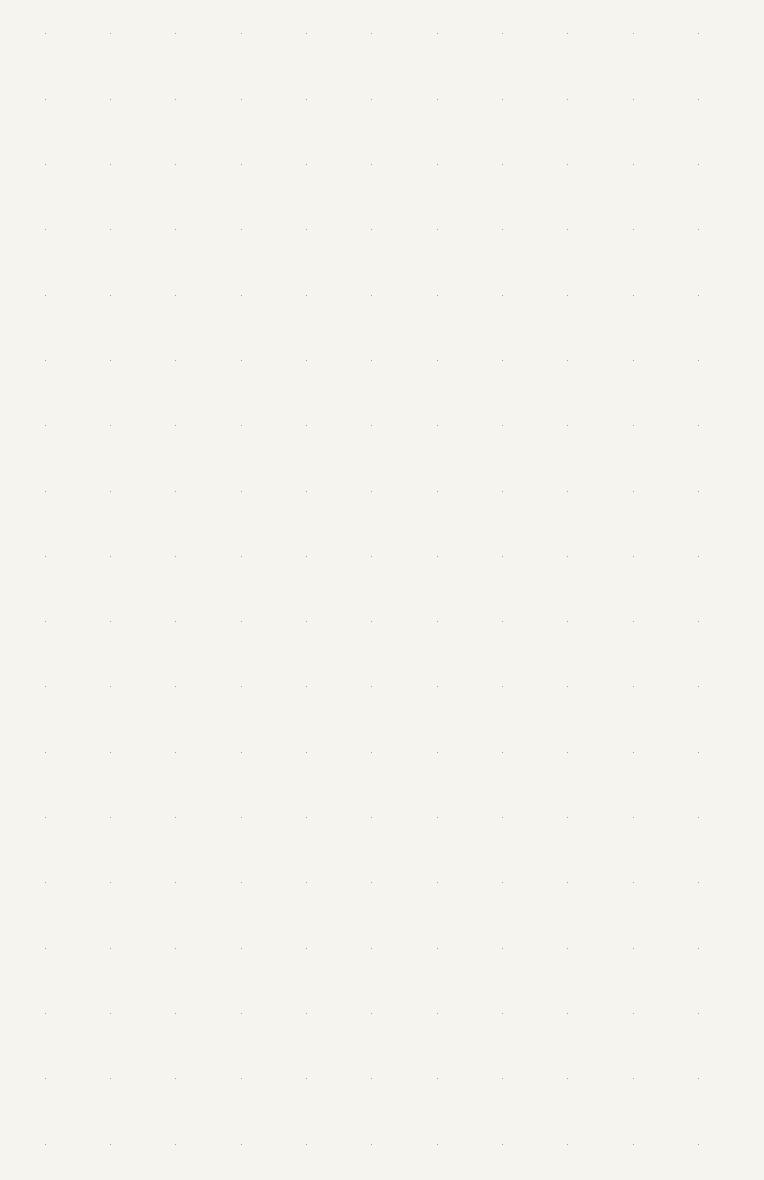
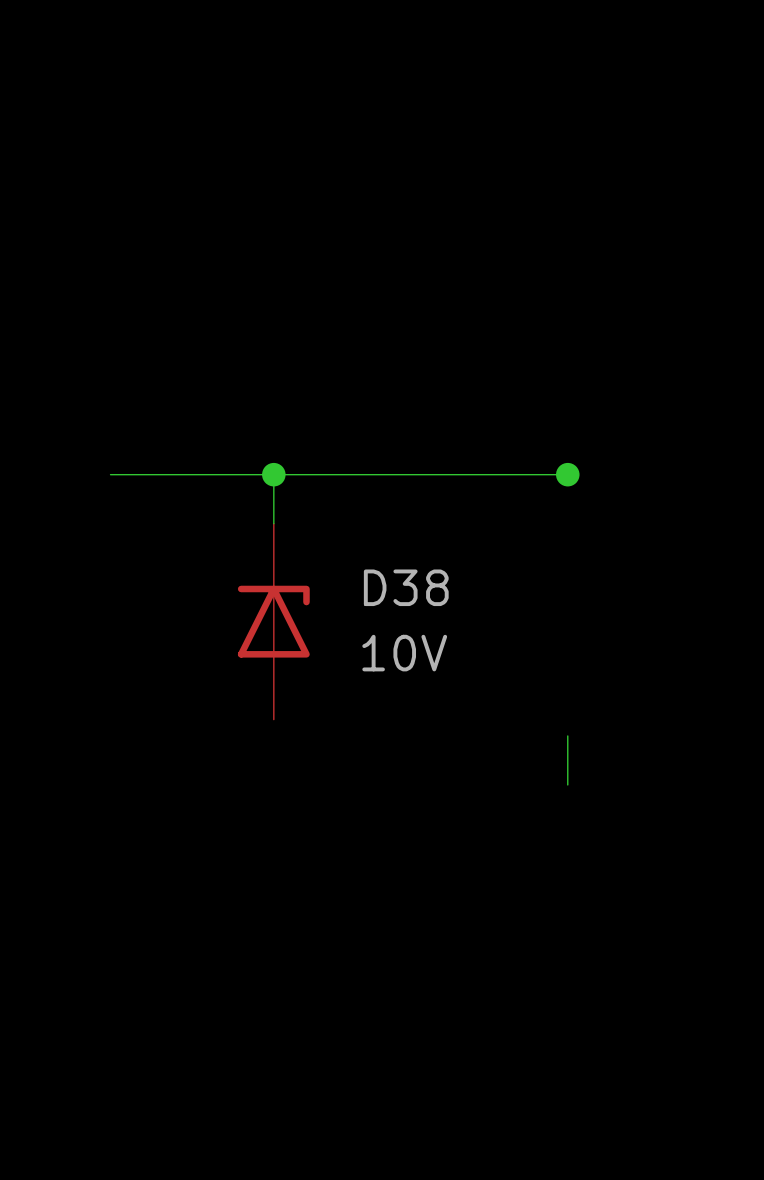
wire: none -> (110, 474) (567, 474)
wire: none -> (273, 474) (273, 523)
junction: none -> (273, 474)
junction: none -> (567, 474)
D38: none -> 10V (273, 621)
wire: none -> (567, 735) (567, 784)

